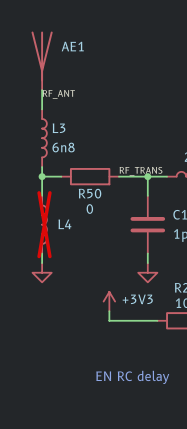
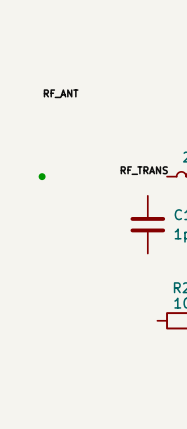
AE1: (42, 60) -> none
wire: (42, 90) (42, 109) -> none
L3: 6n8 (44, 138) -> none
wire: (42, 167) (42, 195) -> none
wire: (42, 176) (61, 176) -> none
R50: 0 (90, 176) -> none
wire: (118, 176) (167, 176) -> none
wire: (147, 176) (147, 195) -> none
junction: (147, 176) -> none
L4: (44, 224) -> none
wire: (42, 253) (42, 263) -> none
wire: (147, 253) (147, 263) -> none
power symbol: (42, 272) -> none
power symbol: (147, 272) -> none
power symbol: +3V3 (109, 301) -> none
wire: (109, 311) (109, 320) (157, 320) -> none
text: EN RC delay (132, 377) -> none

